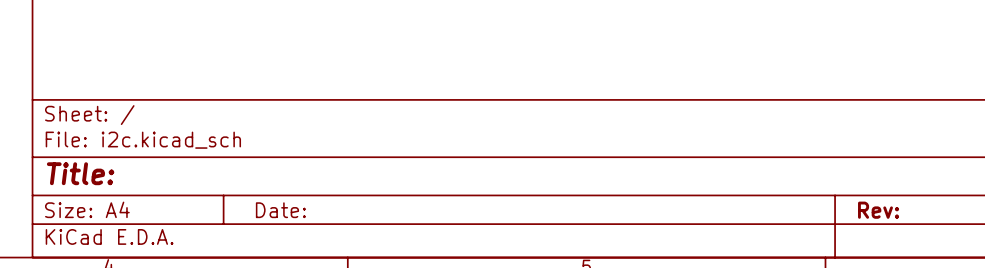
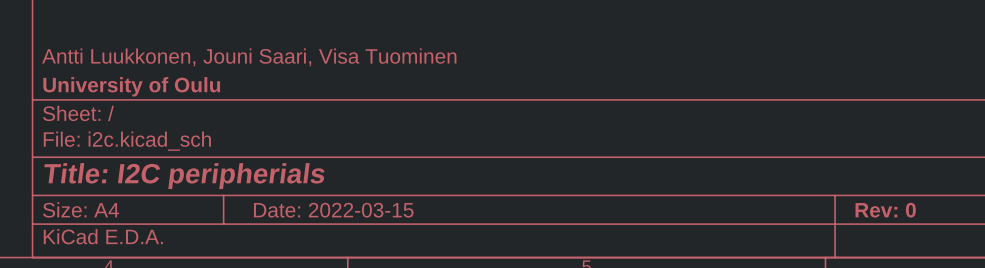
title block: none -> Antti Luukkonen, Jouni Saari, Visa Tuominen (249, 57)
title block: none -> University of Oulu (131, 86)
title block: Title: (80, 173) -> Title: I2C peripherials (184, 176)
title block: Date: (280, 210) -> Date: 2022-03-15 (333, 210)
title block: Rev: (878, 210) -> Rev: 0 (885, 210)

